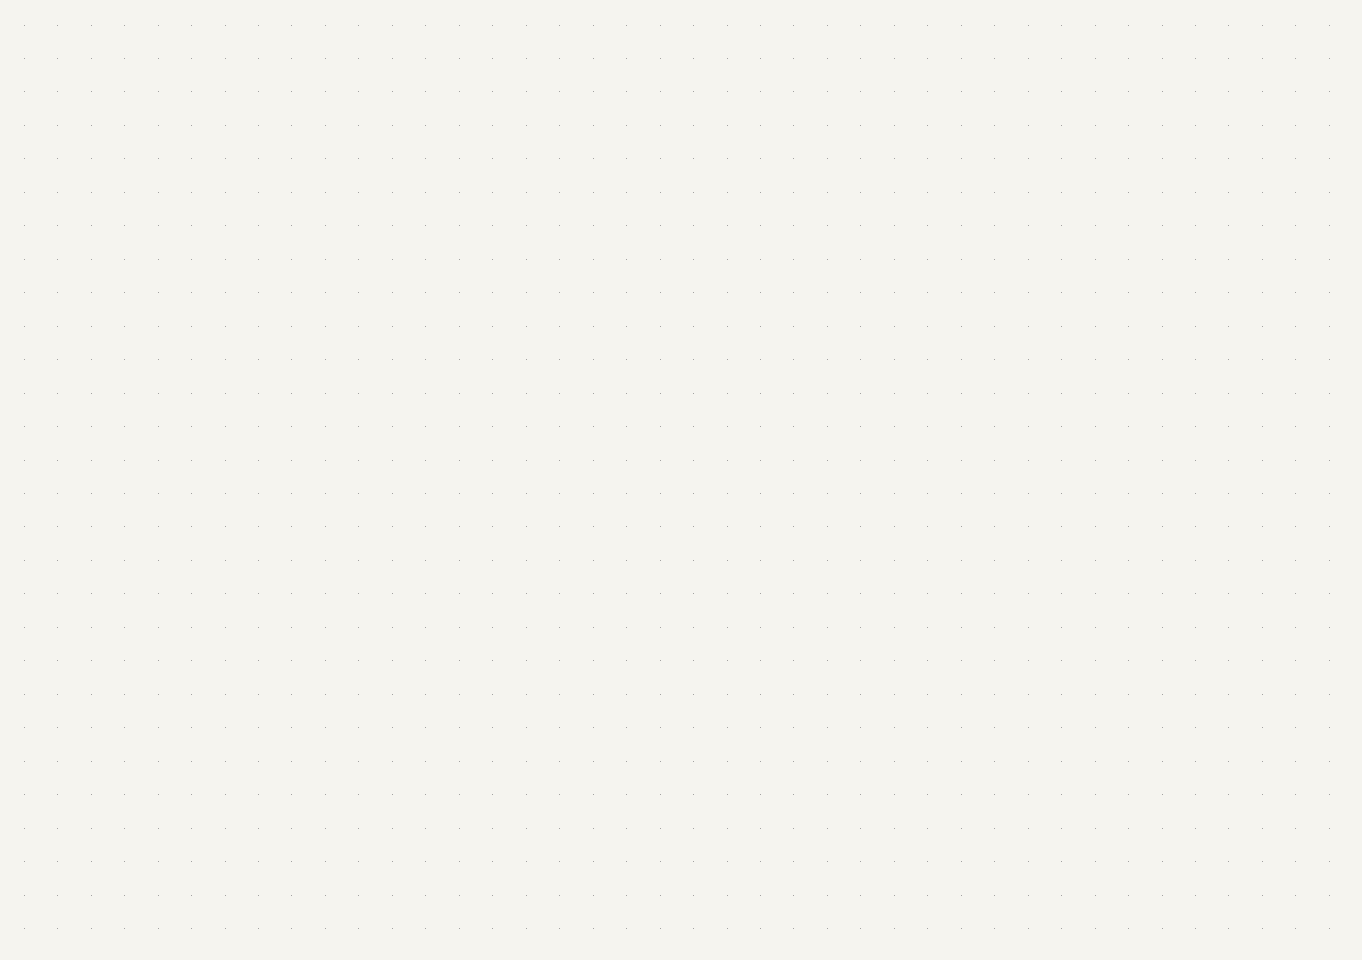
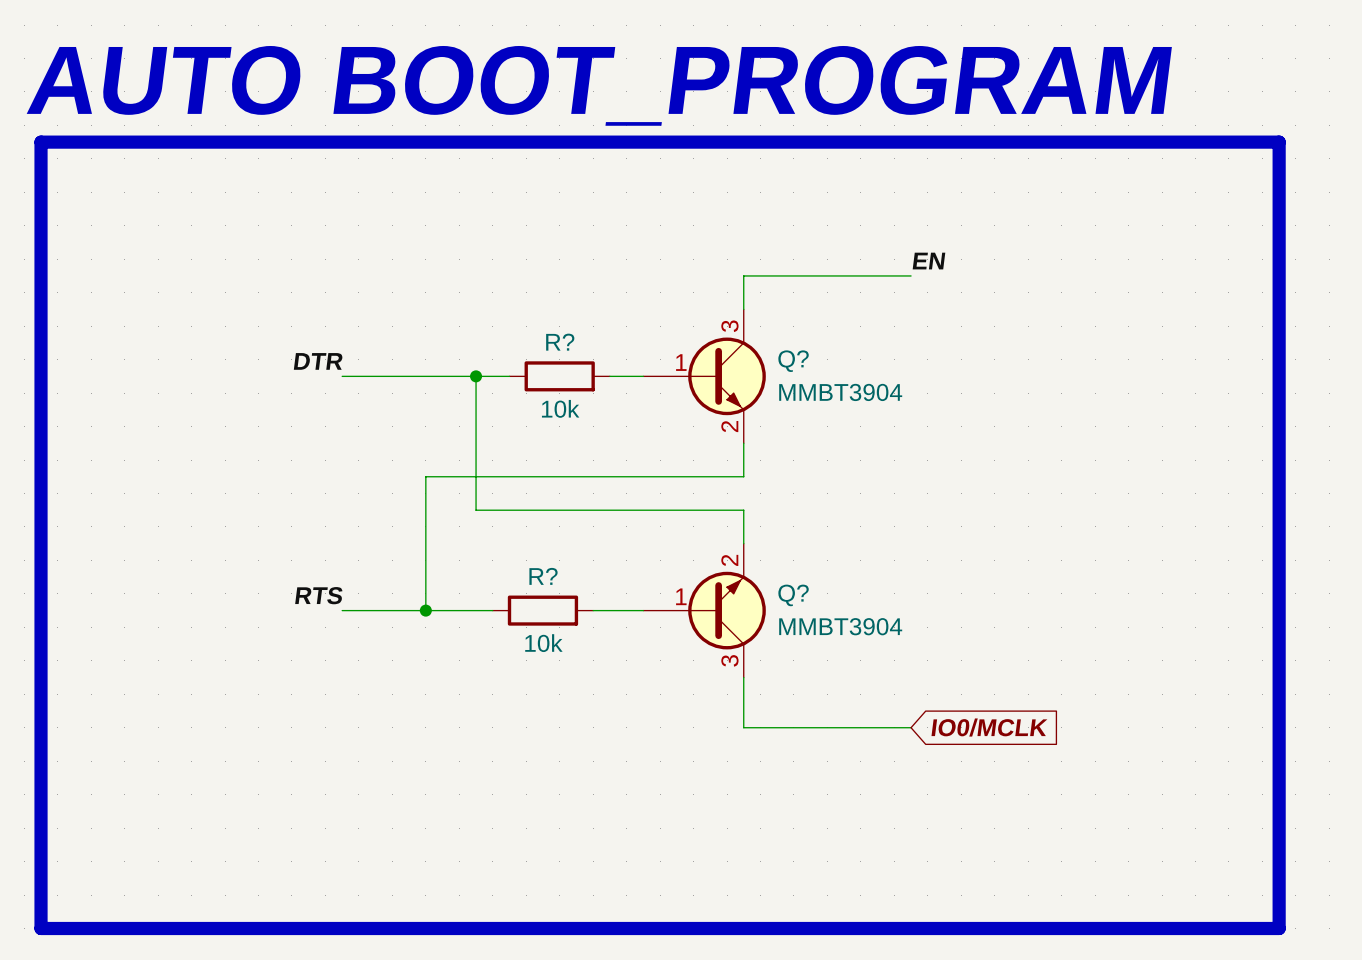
text: none -> AUTO BOOT_PROGRAM (599, 85)
line: none -> (41, 142) (1279, 142) (1279, 928) (41, 928) (41, 142)
label: none -> EN (928, 261)
wire: none -> (911, 275) (743, 275) (743, 309)
label: none -> DTR (318, 361)
wire: none -> (342, 376) (509, 376)
wire: none -> (476, 376) (476, 510) (743, 510) (743, 543)
junction: none -> (476, 376)
R?: none -> 10k (559, 376)
wire: none -> (609, 376) (643, 376)
Q?: none -> MMBT3904 (704, 376)
wire: none -> (743, 443) (743, 476) (425, 476) (425, 610)
label: none -> RTS (318, 595)
wire: none -> (342, 610) (492, 610)
junction: none -> (425, 610)
R?: none -> 10k (542, 610)
wire: none -> (593, 610) (643, 610)
Q?: none -> MMBT3904 (704, 610)
wire: none -> (743, 677) (743, 727) (911, 727)
global label: none -> IO0/MCLK (989, 727)

